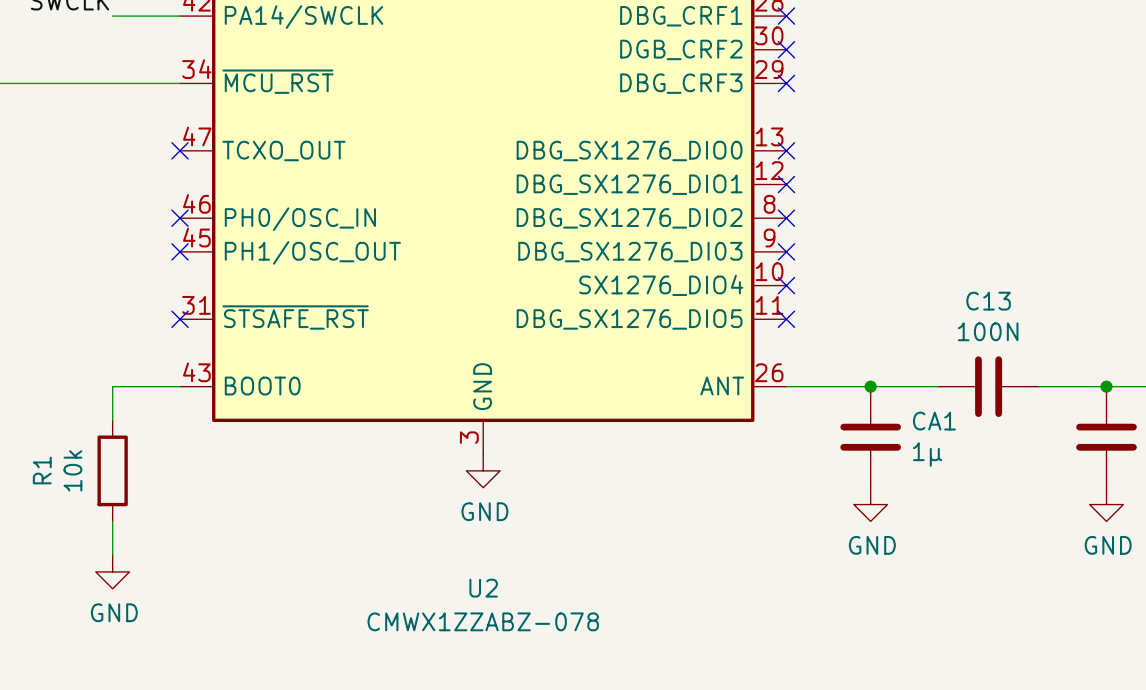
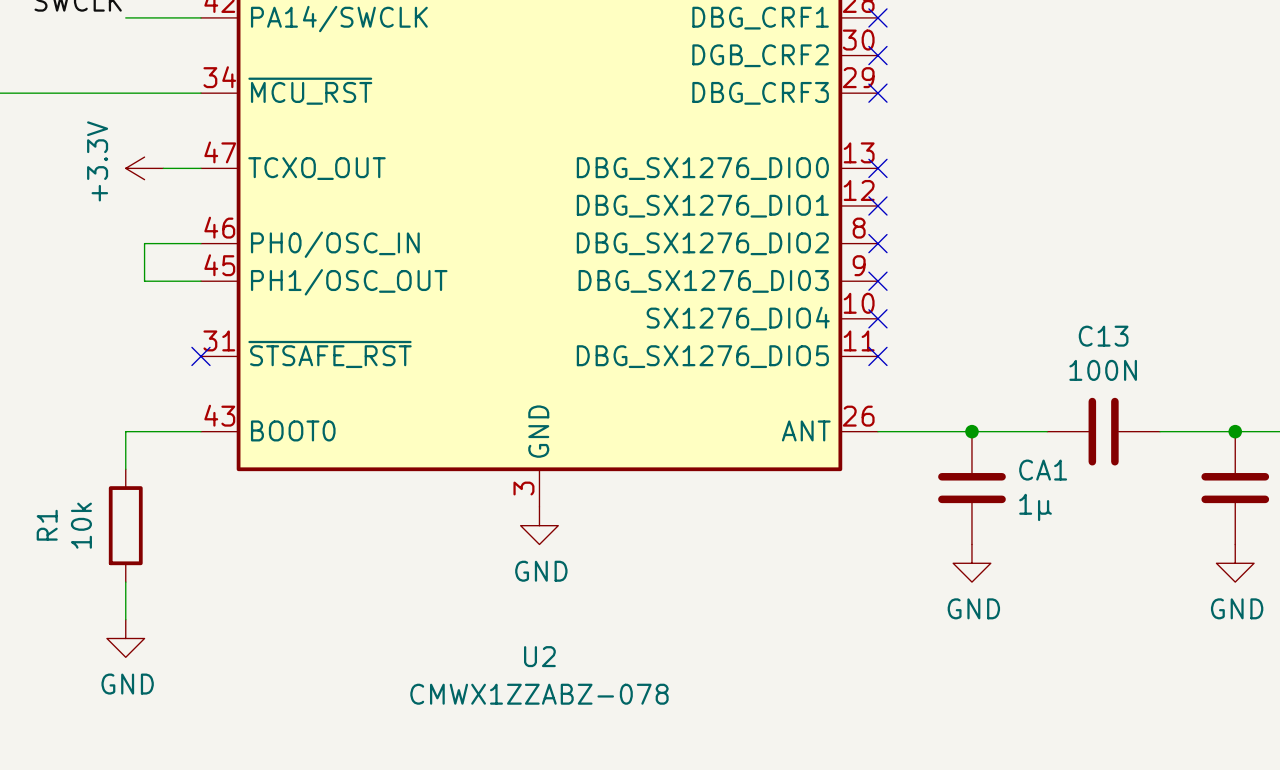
power symbol: none -> +3.3V (144, 168)
wire: none -> (163, 168) (200, 168)
no-connect mark: (180, 150) -> none
wire: none -> (200, 243) (144, 243) (144, 281) (200, 281)
no-connect mark: (180, 218) -> none
no-connect mark: (180, 251) -> none

